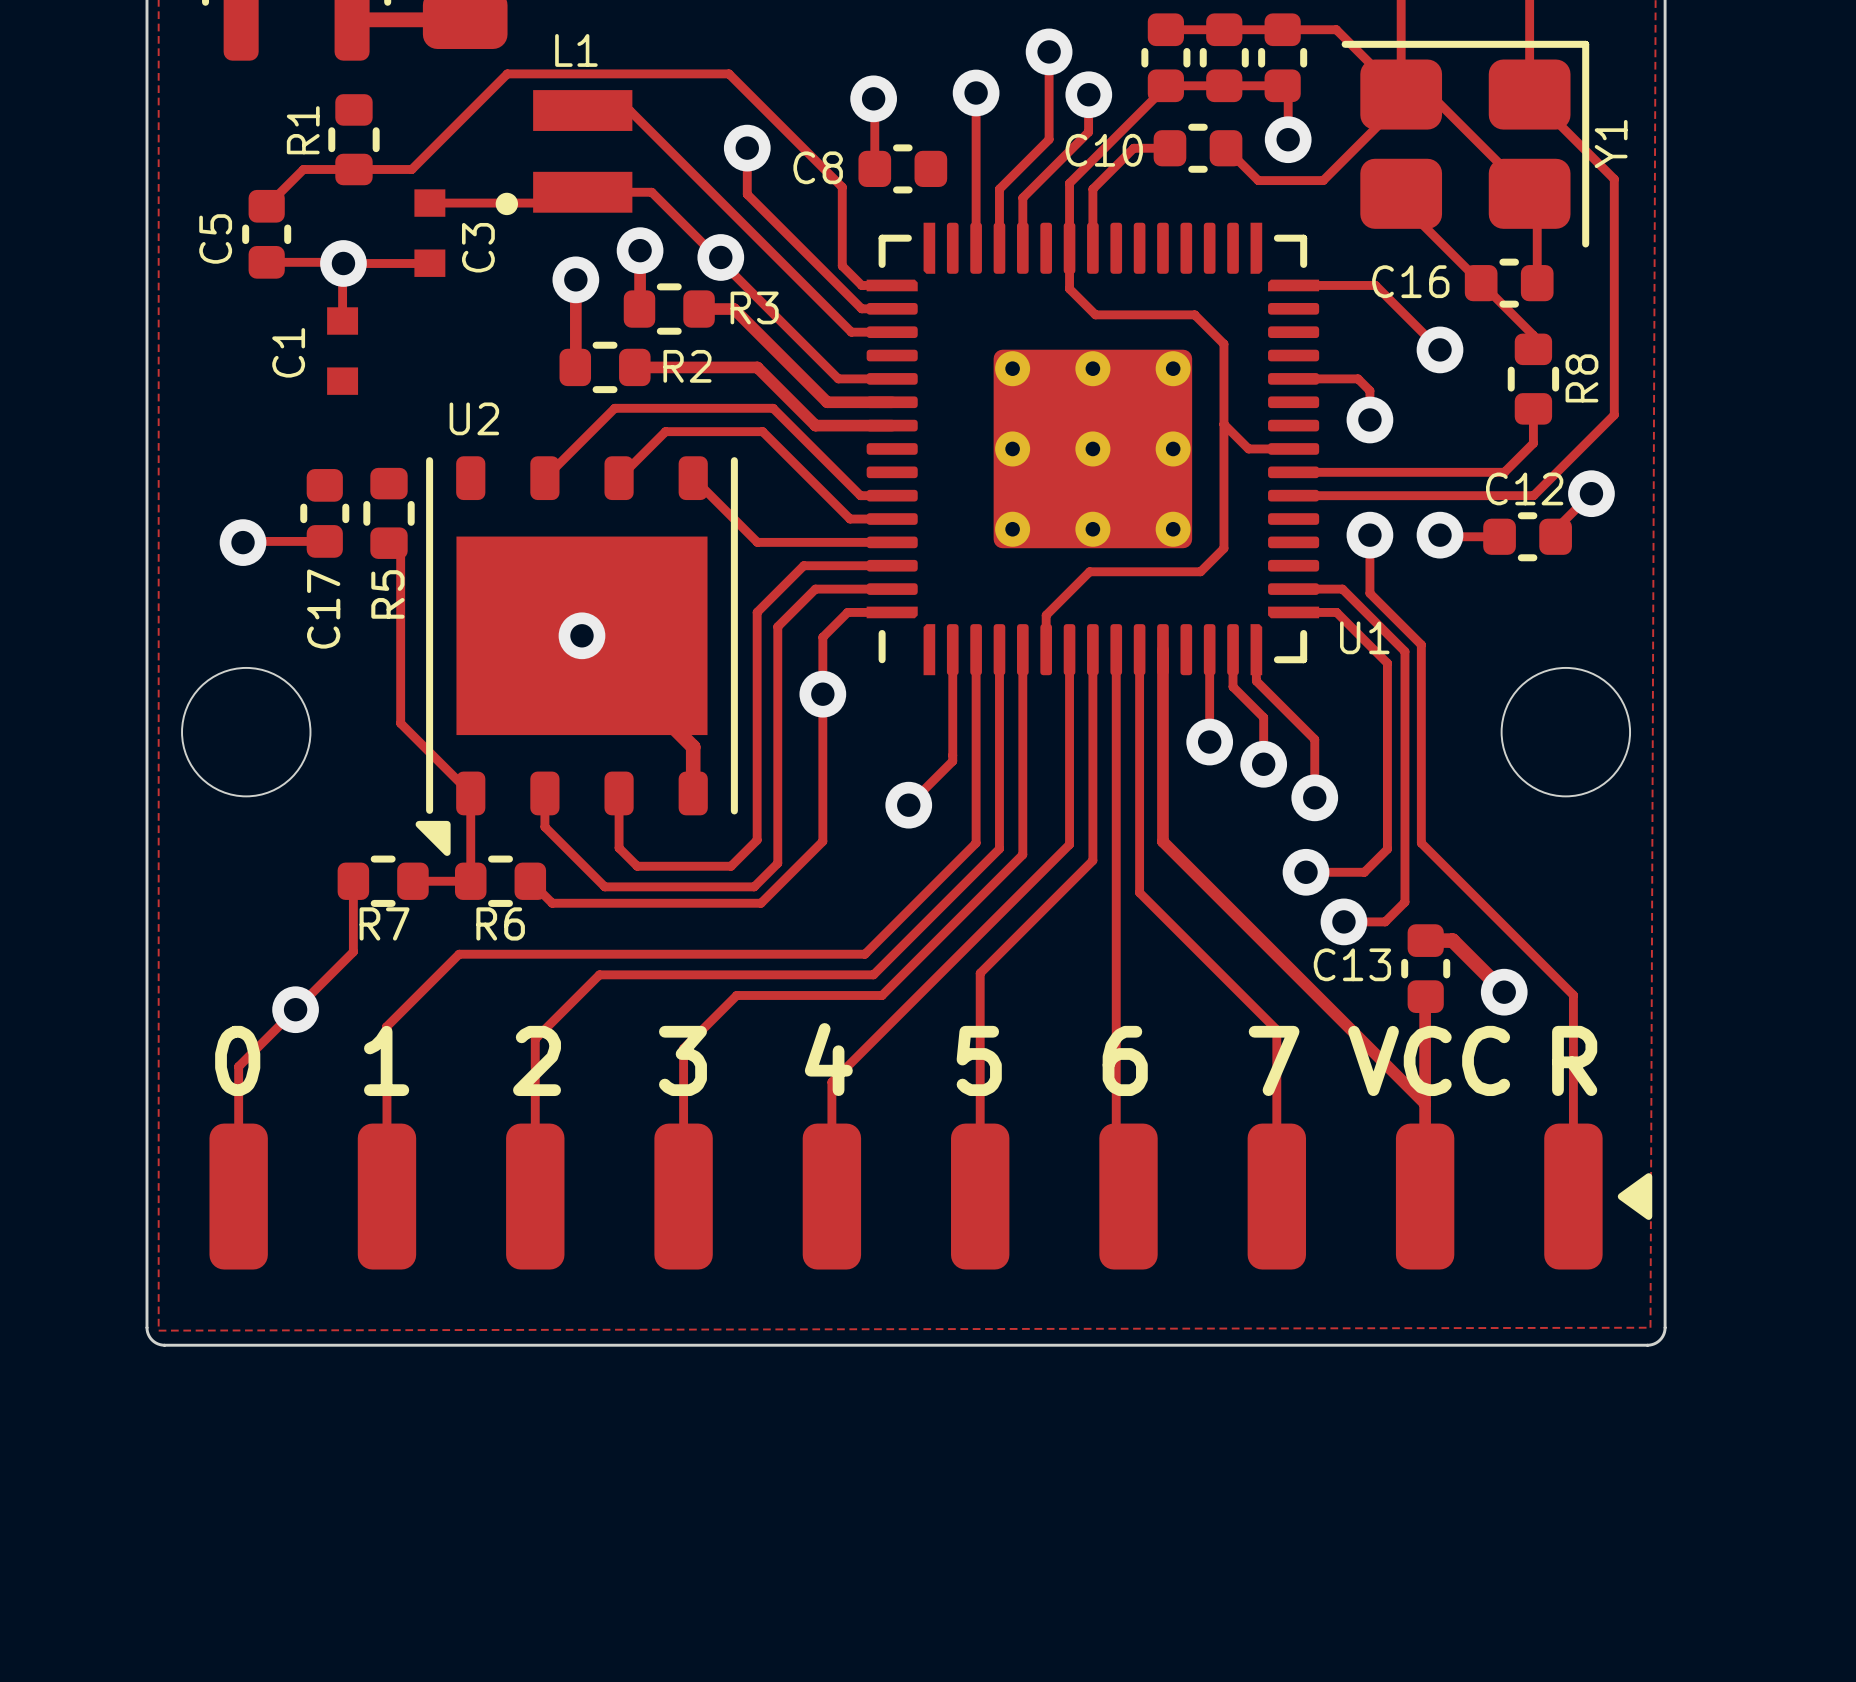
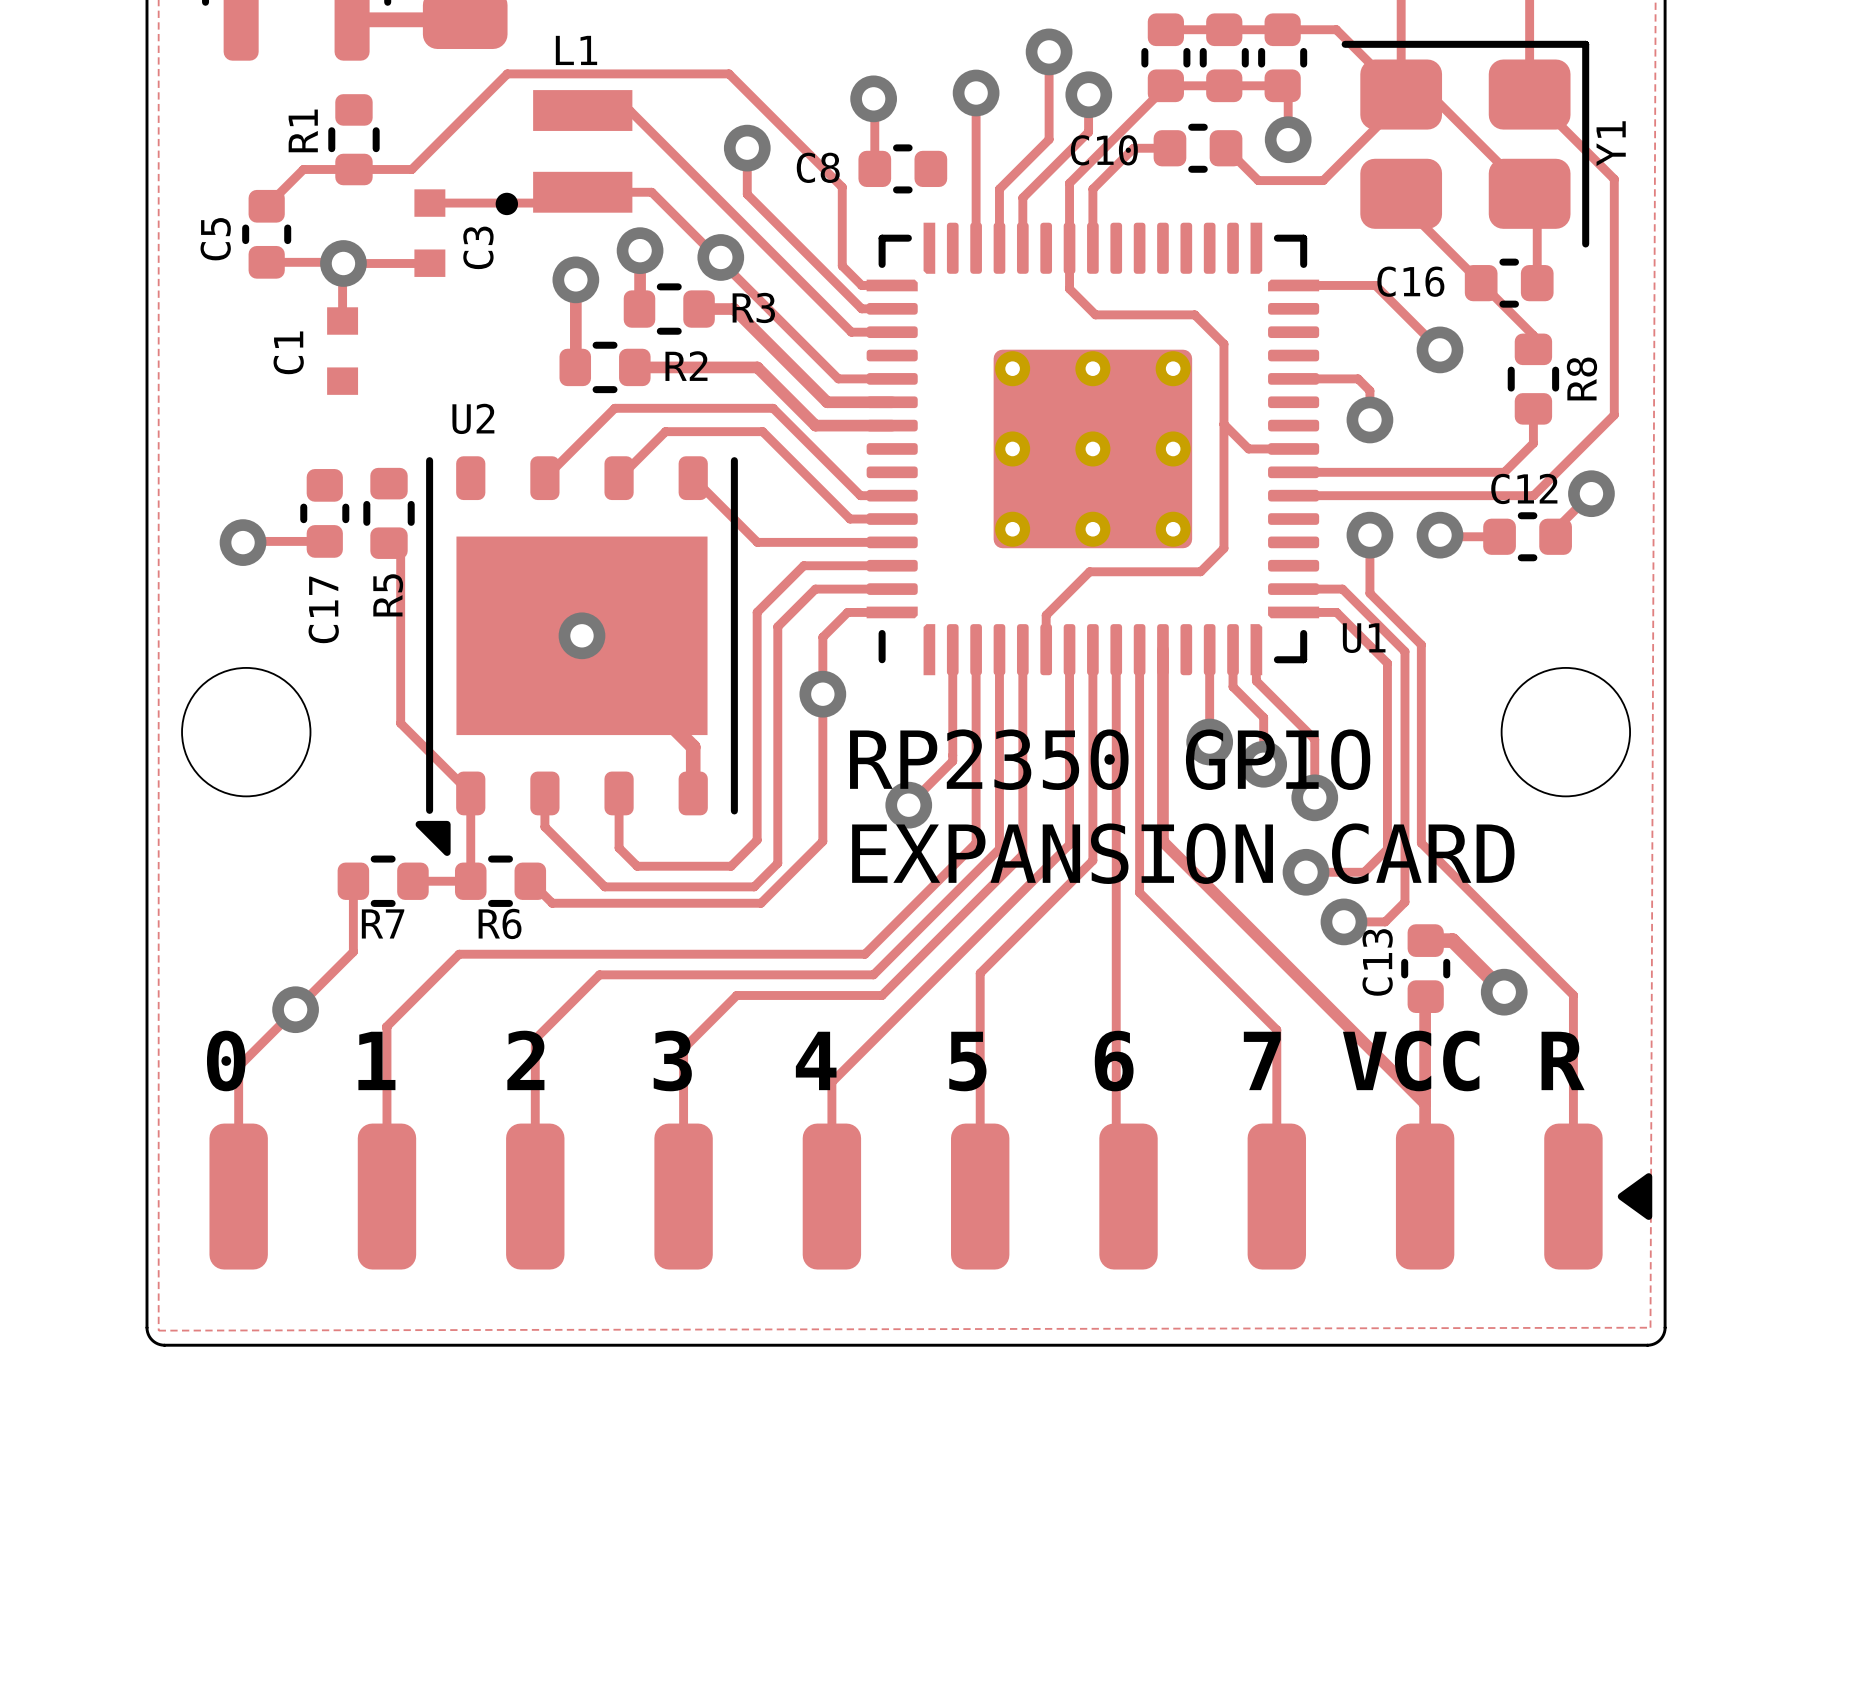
text: none -> RP2350 GPIO (1110, 759)
text: none -> EXPANSION CARD (1183, 853)
C13 name: none -> C13 (1377, 962)
text: C13 (1352, 964) -> none

